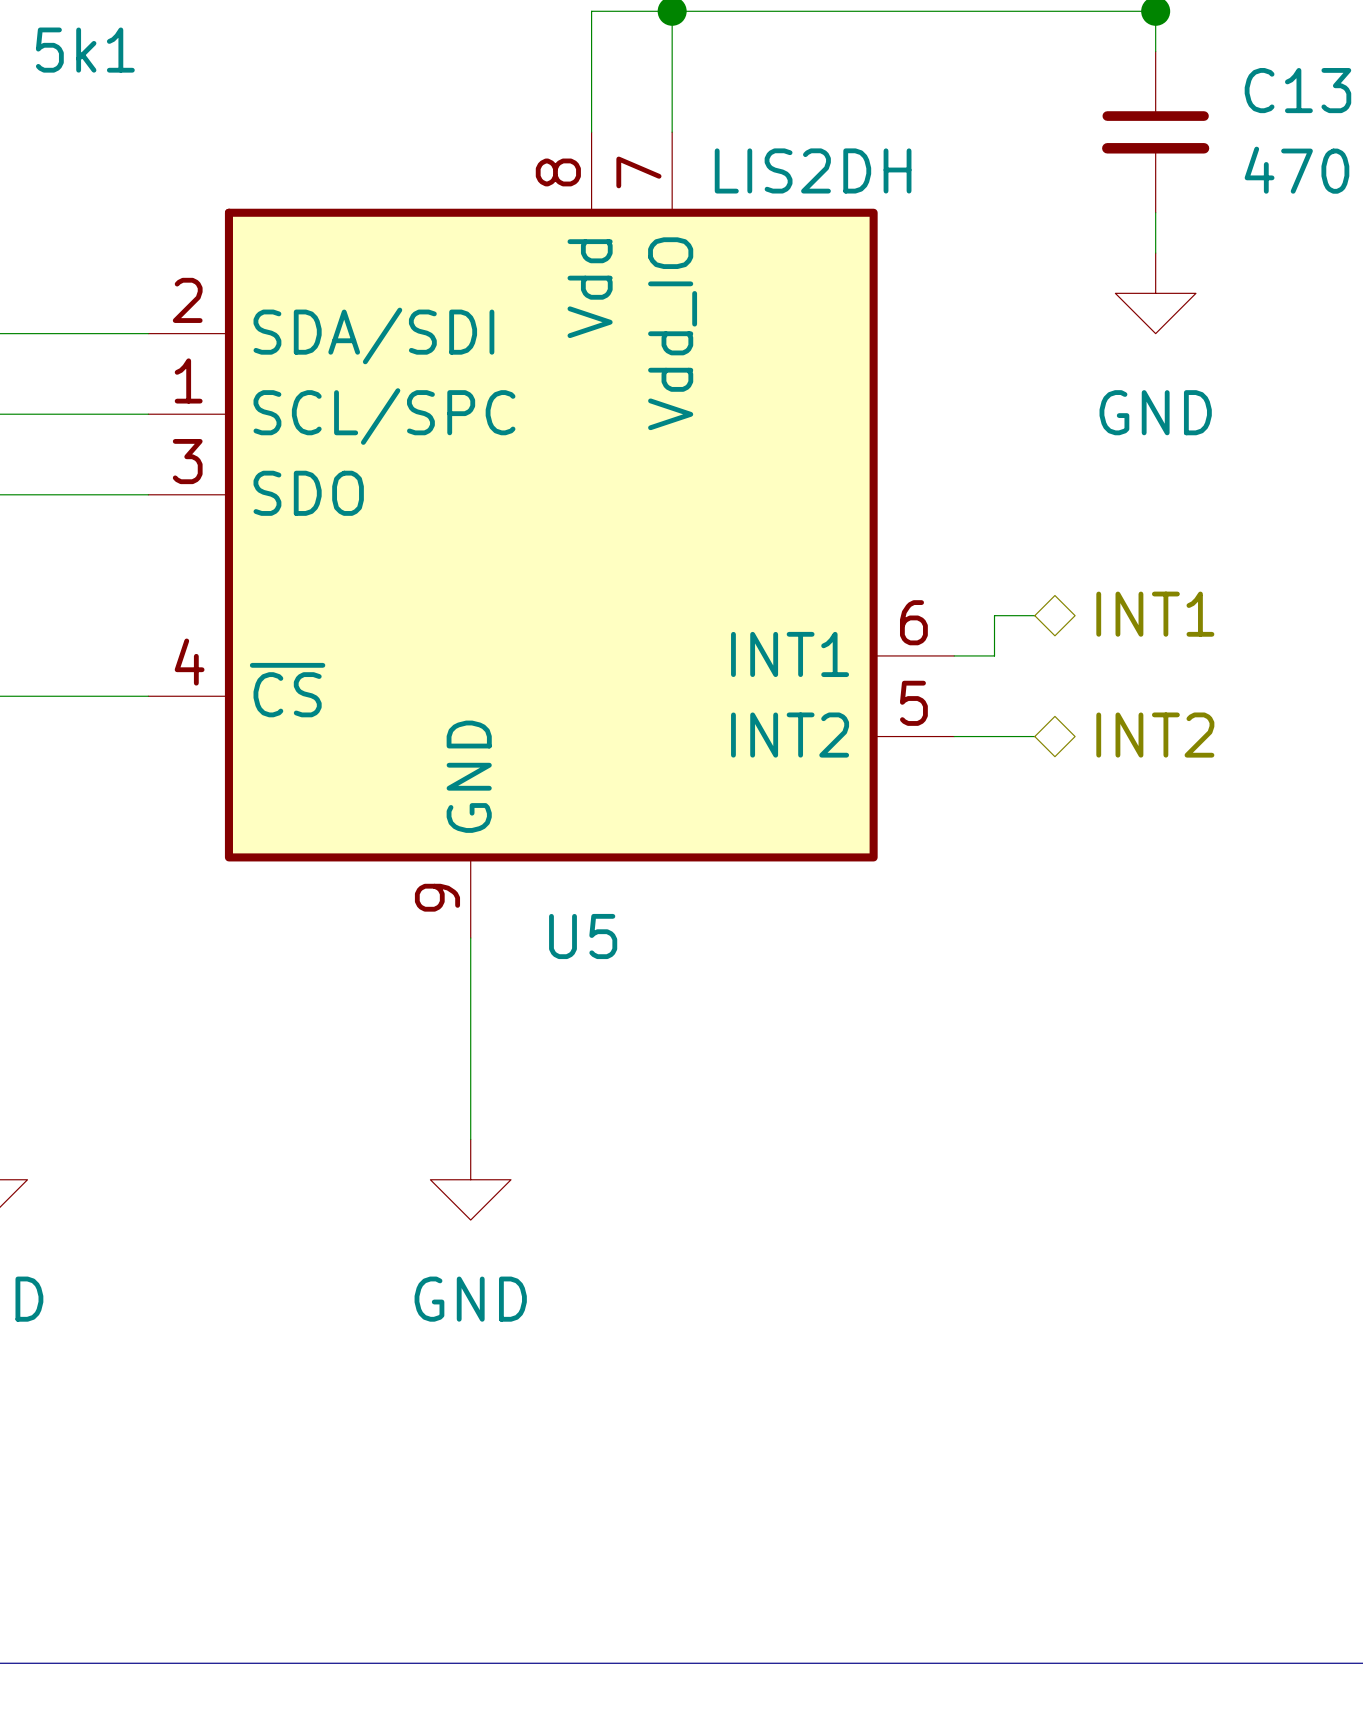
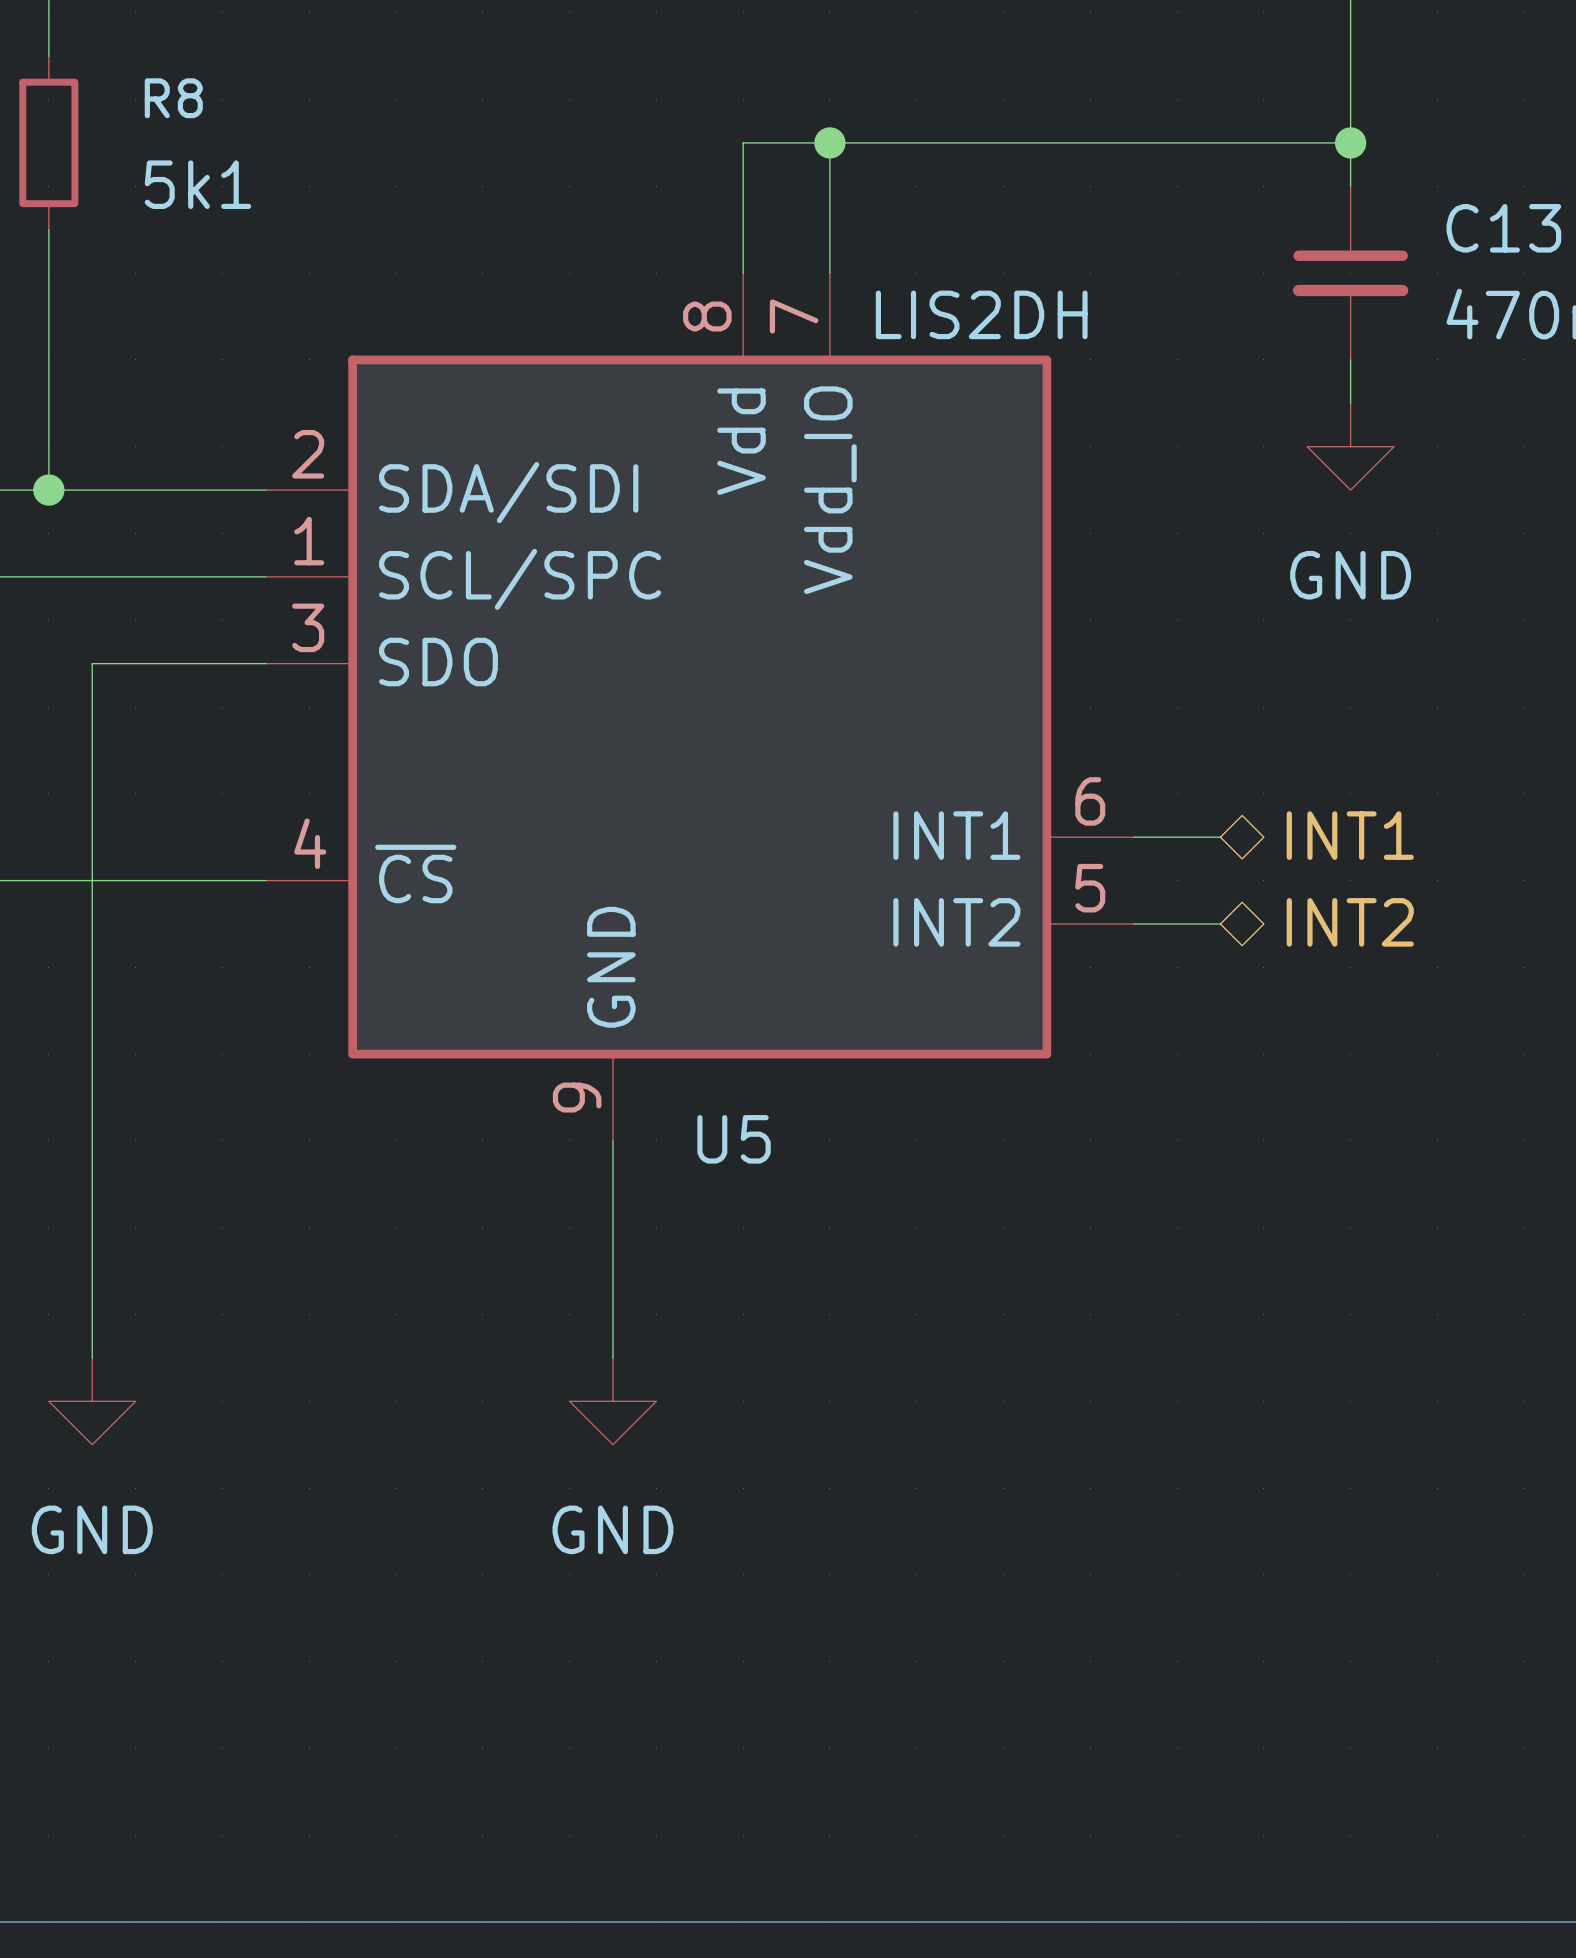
hierarchical label position: INT1 (1155, 614) -> INT1 (1350, 835)
wire: (1034, 615) (994, 615) (994, 655) -> (1220, 837) (1177, 837)

